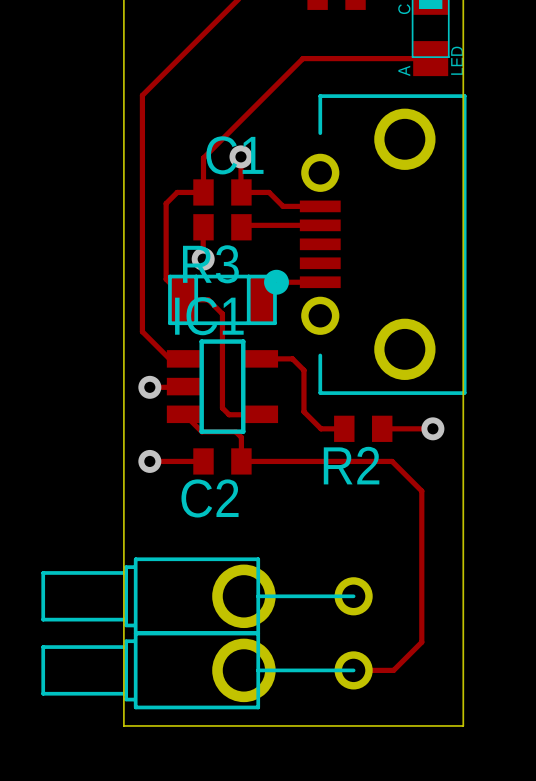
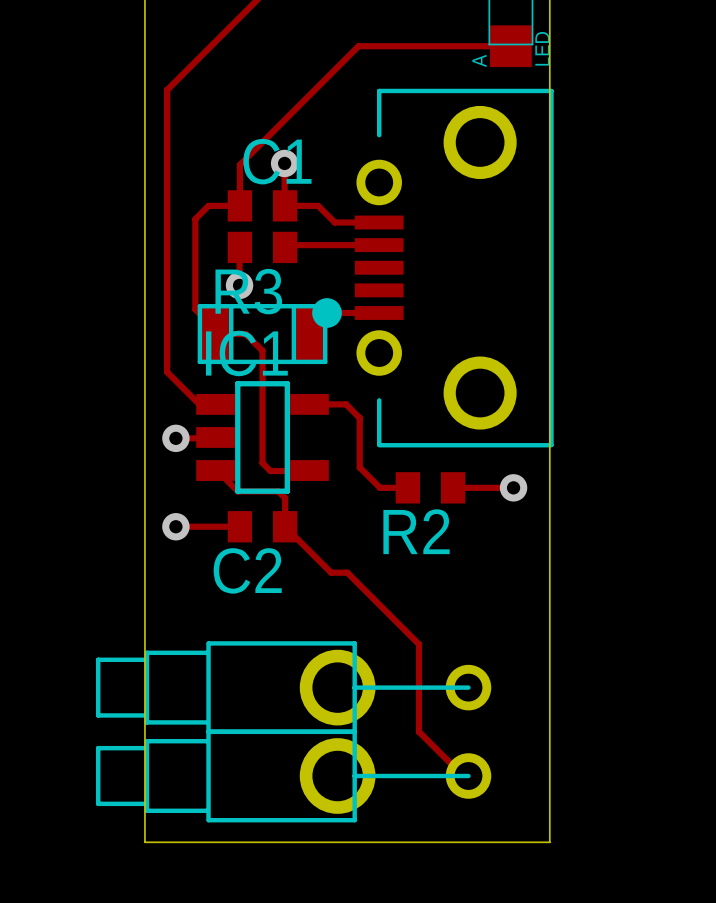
track: (241, 461) (392, 461) (421, 491) (421, 642) (393, 670) -> (285, 526) (331, 572) (347, 572) (418, 644) (418, 731) (463, 776)
part: (207, 596) -> none
part: none -> (293, 687)
part: (207, 670) -> none
part: none -> (293, 776)
track: (353, 670) (390, 670) -> none

